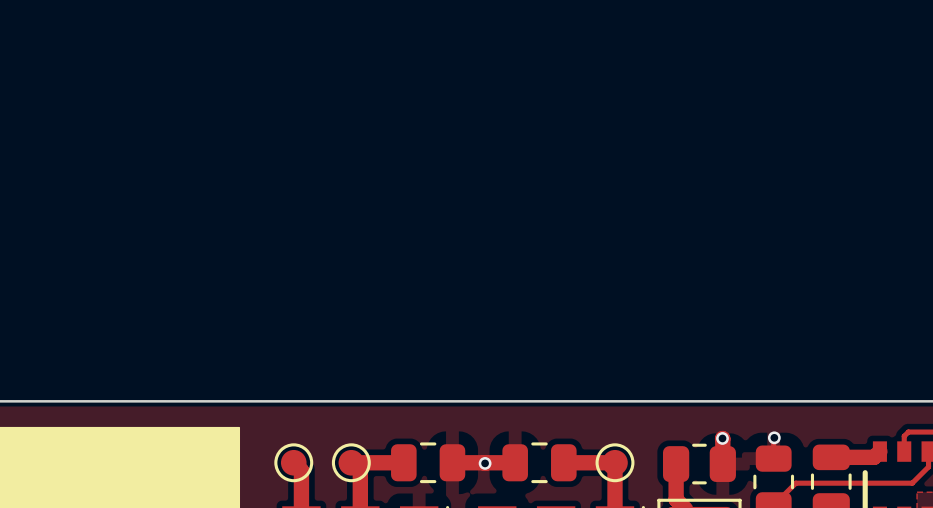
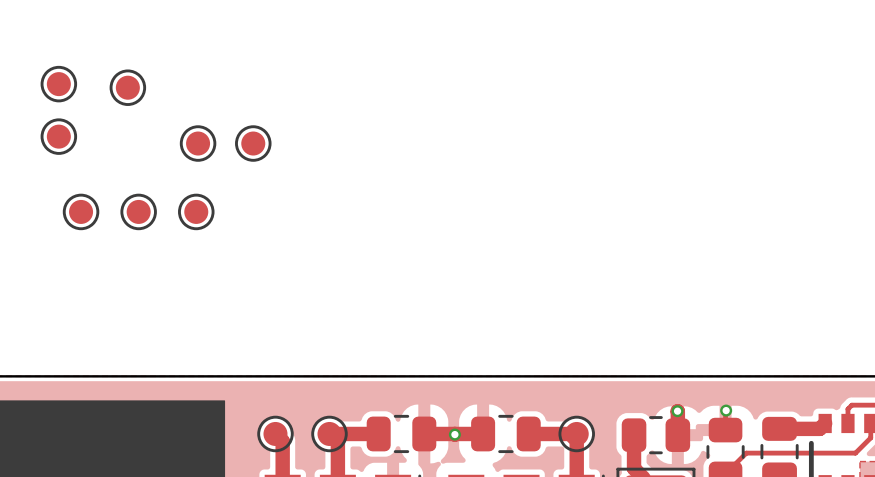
part: none -> (58, 84)
part: none -> (127, 87)
part: none -> (58, 136)
part: none -> (198, 143)
part: none -> (253, 143)
part: none -> (81, 211)
part: none -> (138, 211)
part: none -> (196, 211)

